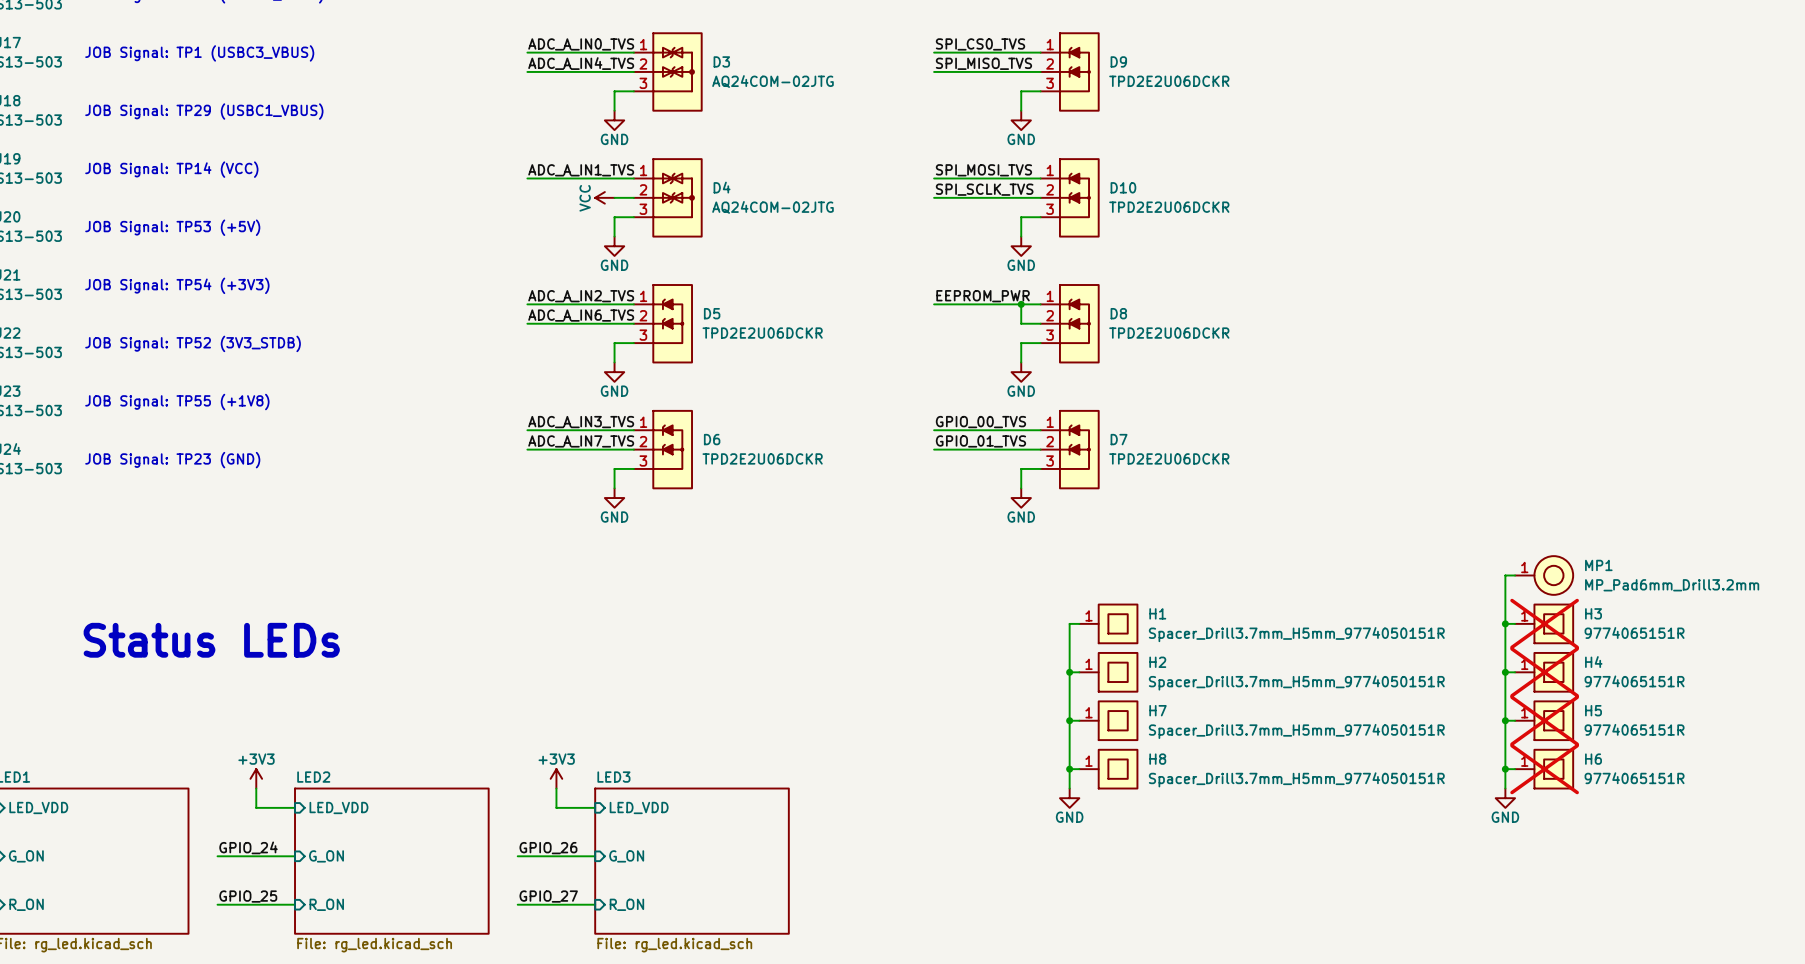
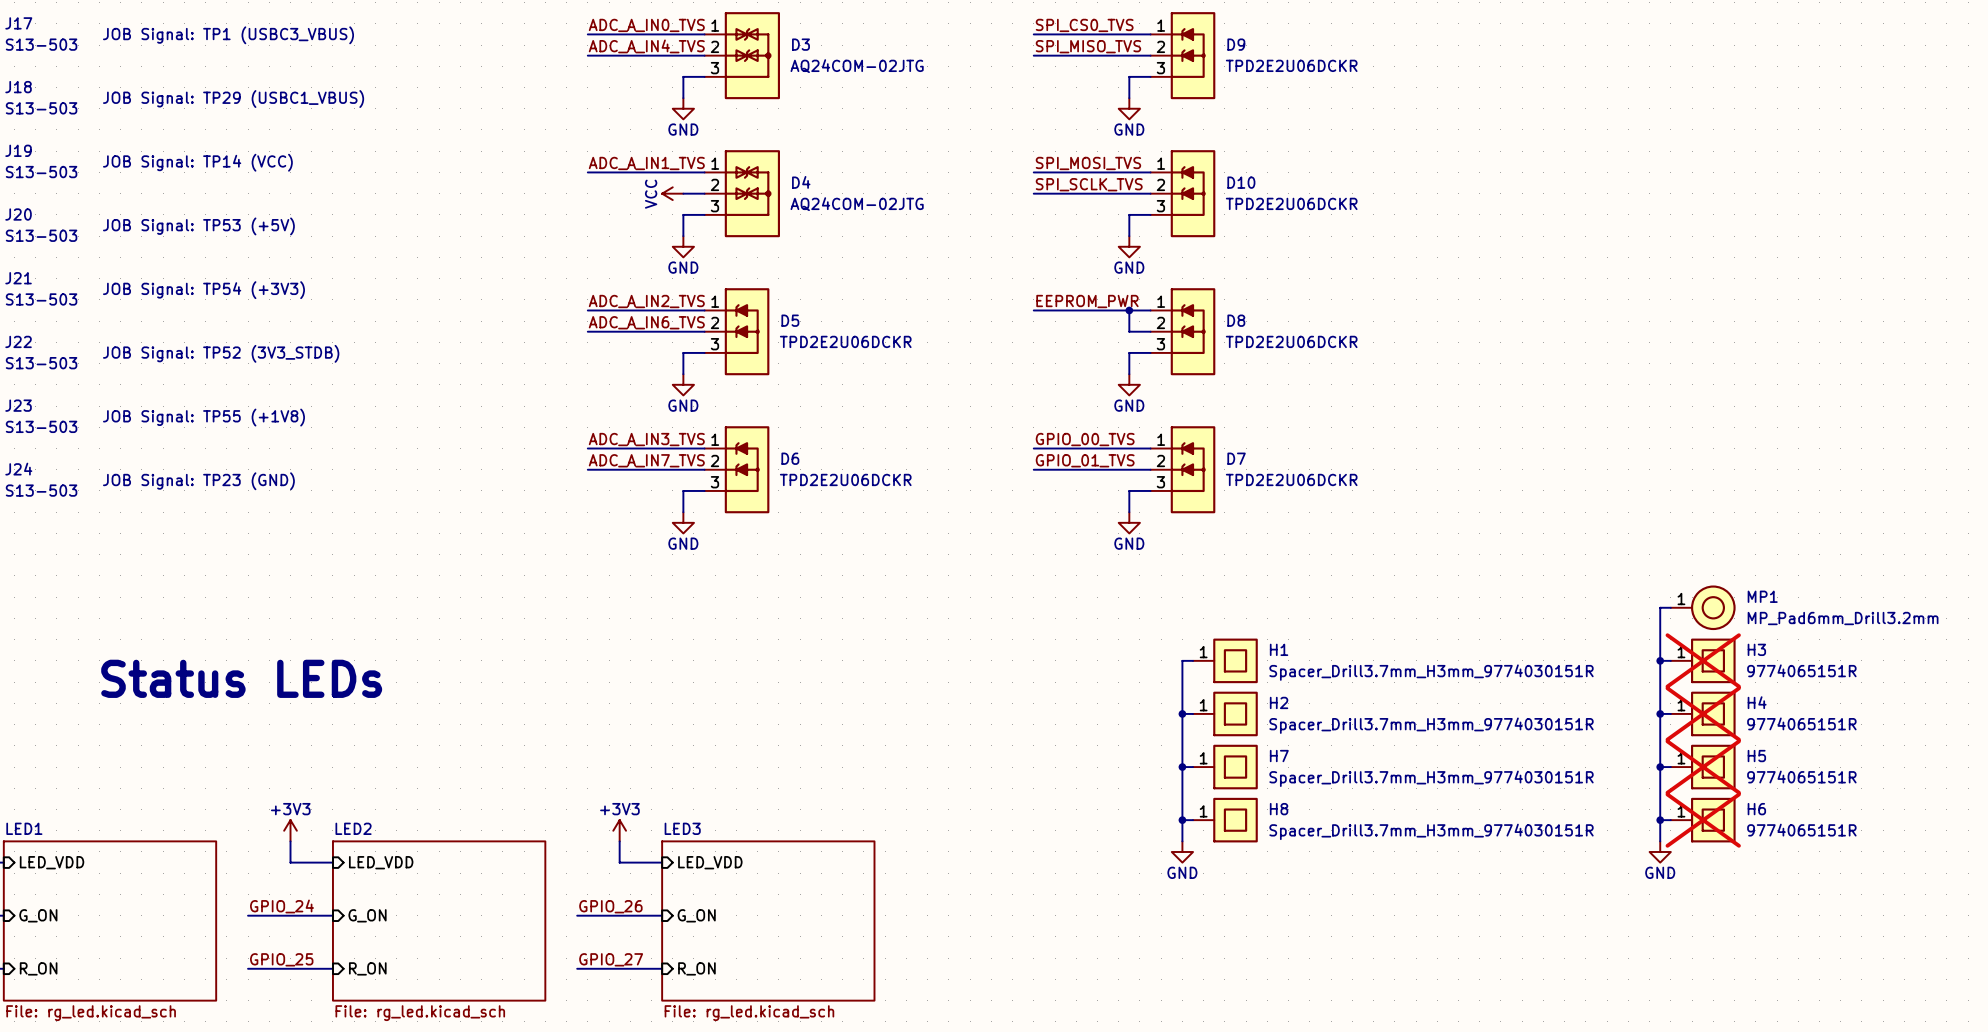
H1 value: Spacer_Drill3.7mm_H5mm_9774050151R (1296, 634) -> Spacer_Drill3.7mm_H3mm_9774030151R (1431, 672)
H2 value: Spacer_Drill3.7mm_H5mm_9774050151R (1296, 683) -> Spacer_Drill3.7mm_H3mm_9774030151R (1431, 725)
H7 value: Spacer_Drill3.7mm_H5mm_9774050151R (1296, 731) -> Spacer_Drill3.7mm_H3mm_9774030151R (1431, 778)
H8 value: Spacer_Drill3.7mm_H5mm_9774050151R (1296, 779) -> Spacer_Drill3.7mm_H3mm_9774030151R (1431, 831)

